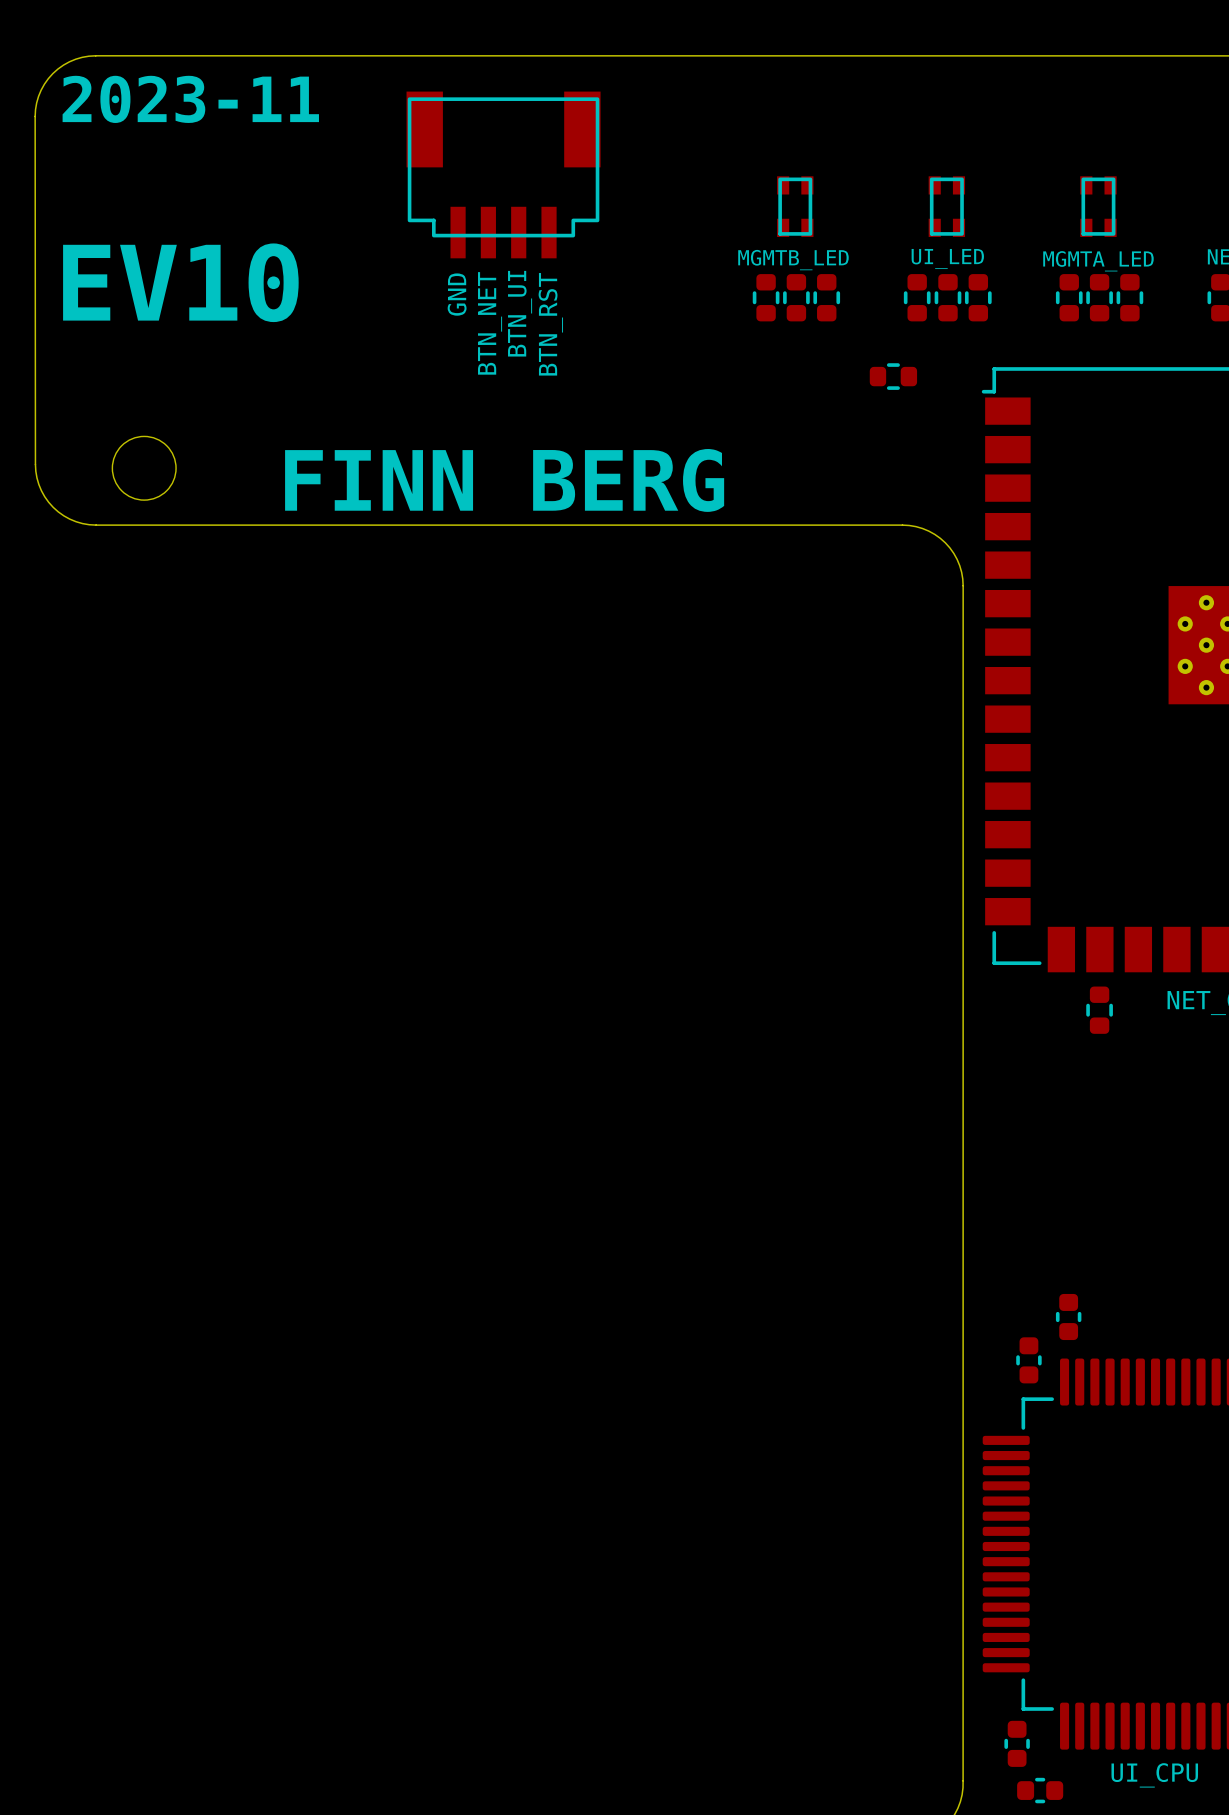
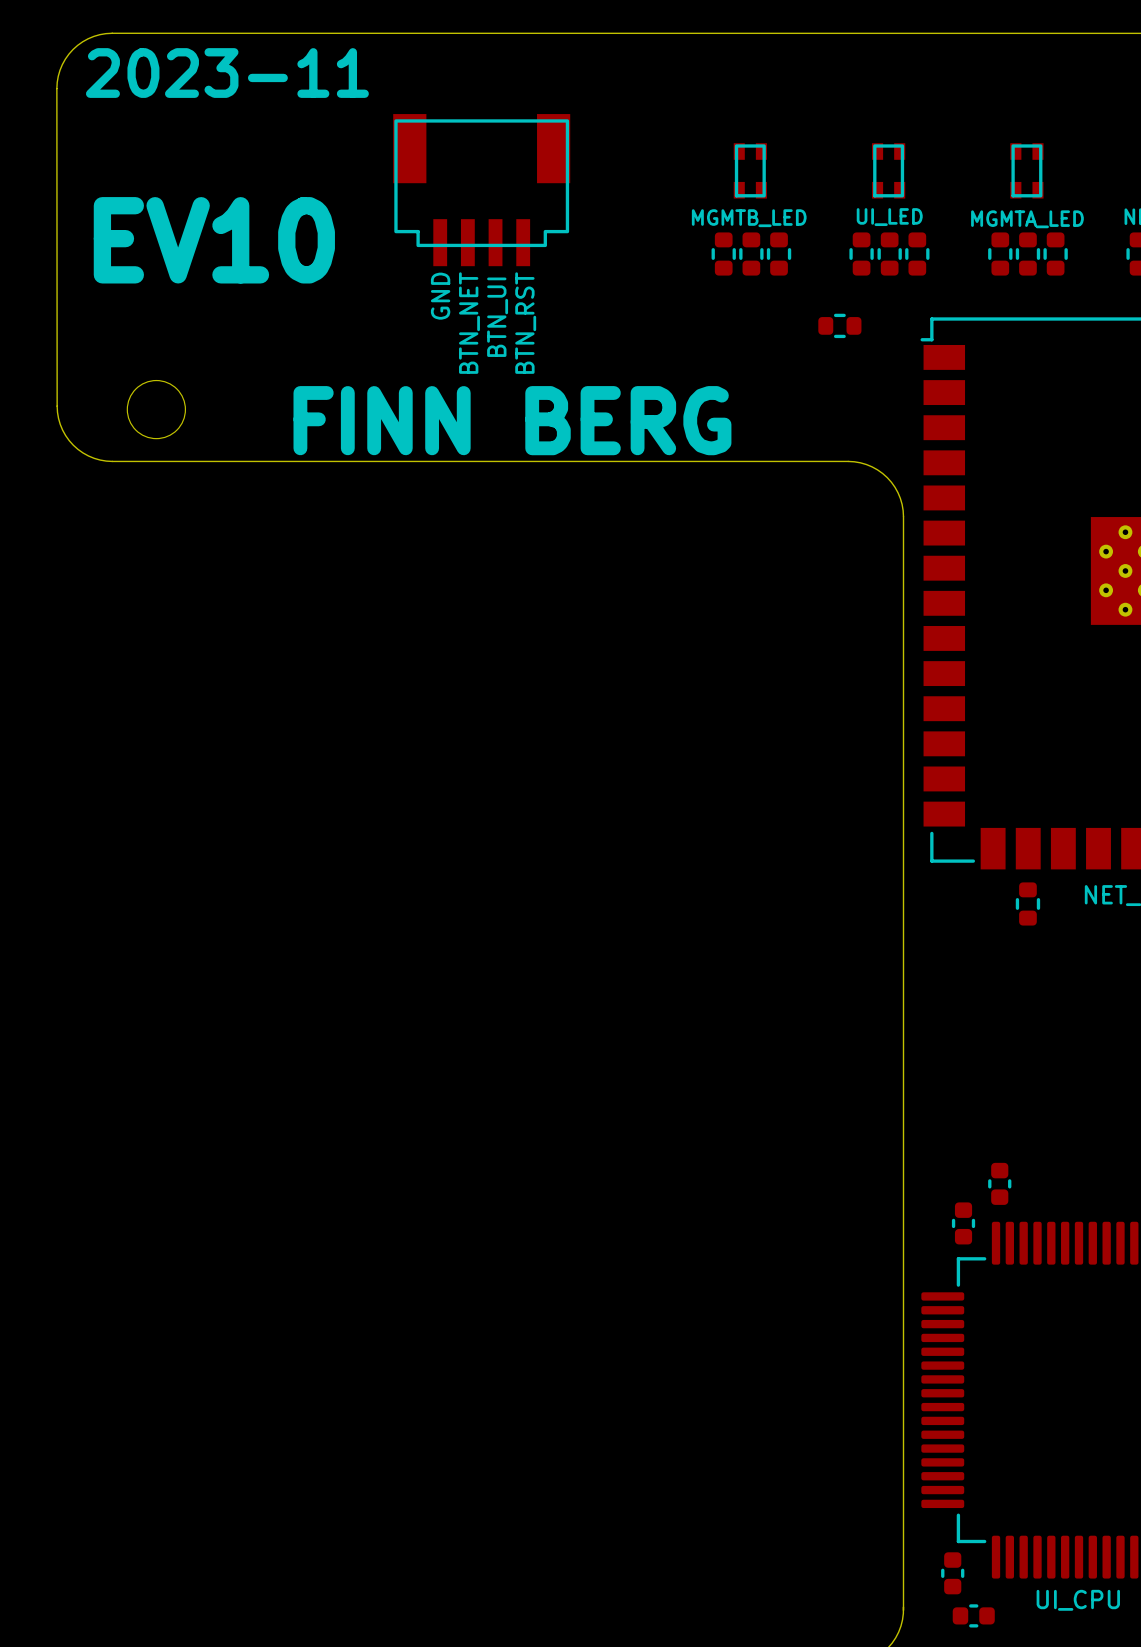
part position: (503, 174) -> (481, 190)
text position: GND (457, 294) -> GND (440, 296)
text position: BTN_UI (520, 313) -> BTN_UI (497, 317)
text position: BTN_NET (490, 323) -> BTN_NET (469, 323)
text position: BTN_RST (550, 324) -> BTN_RST (525, 323)

